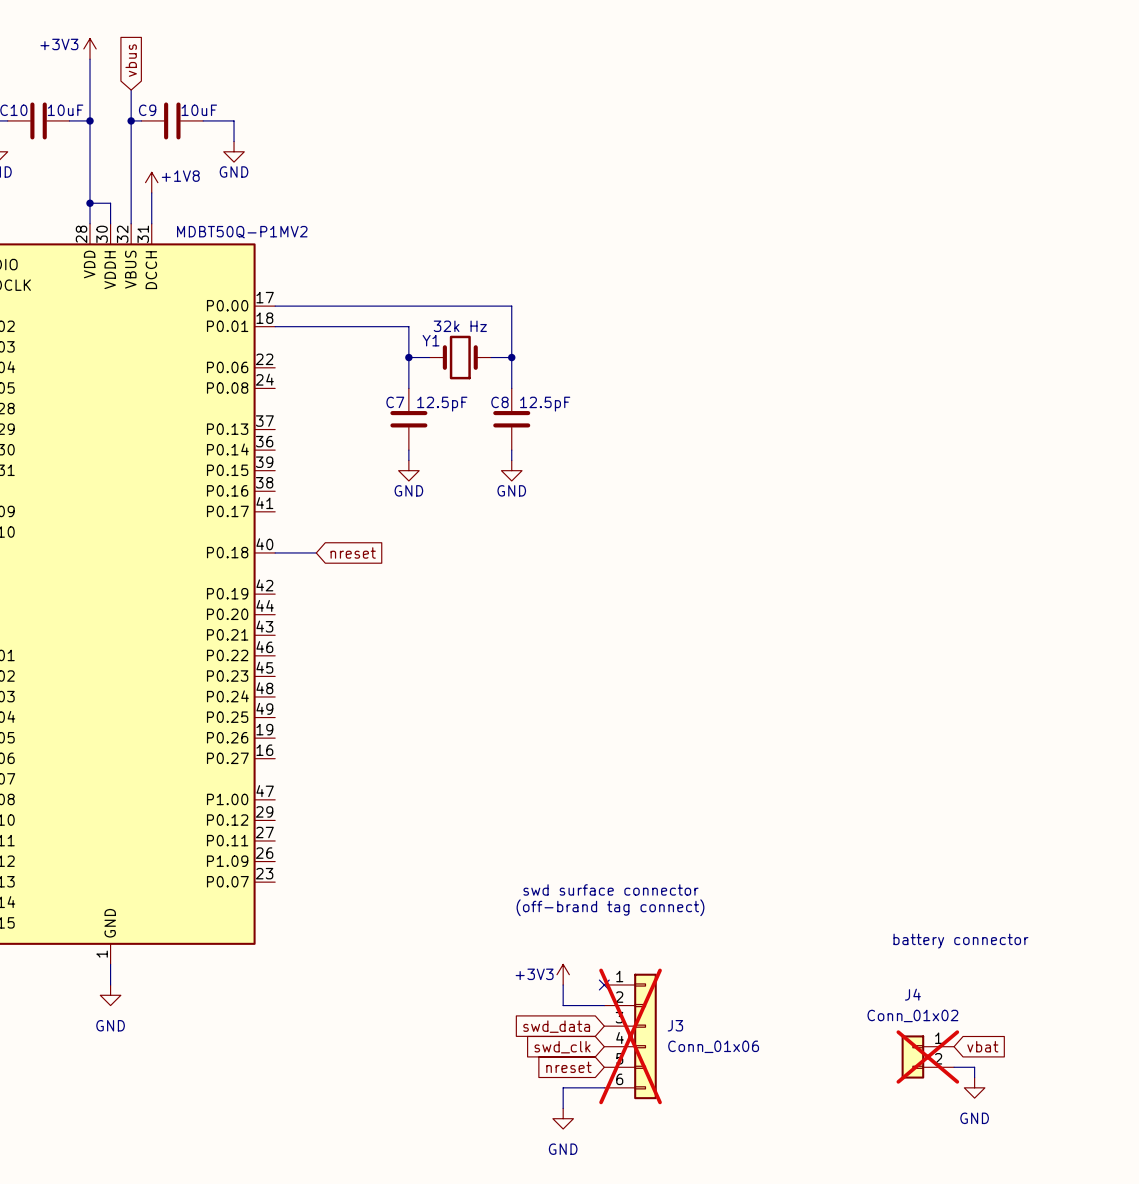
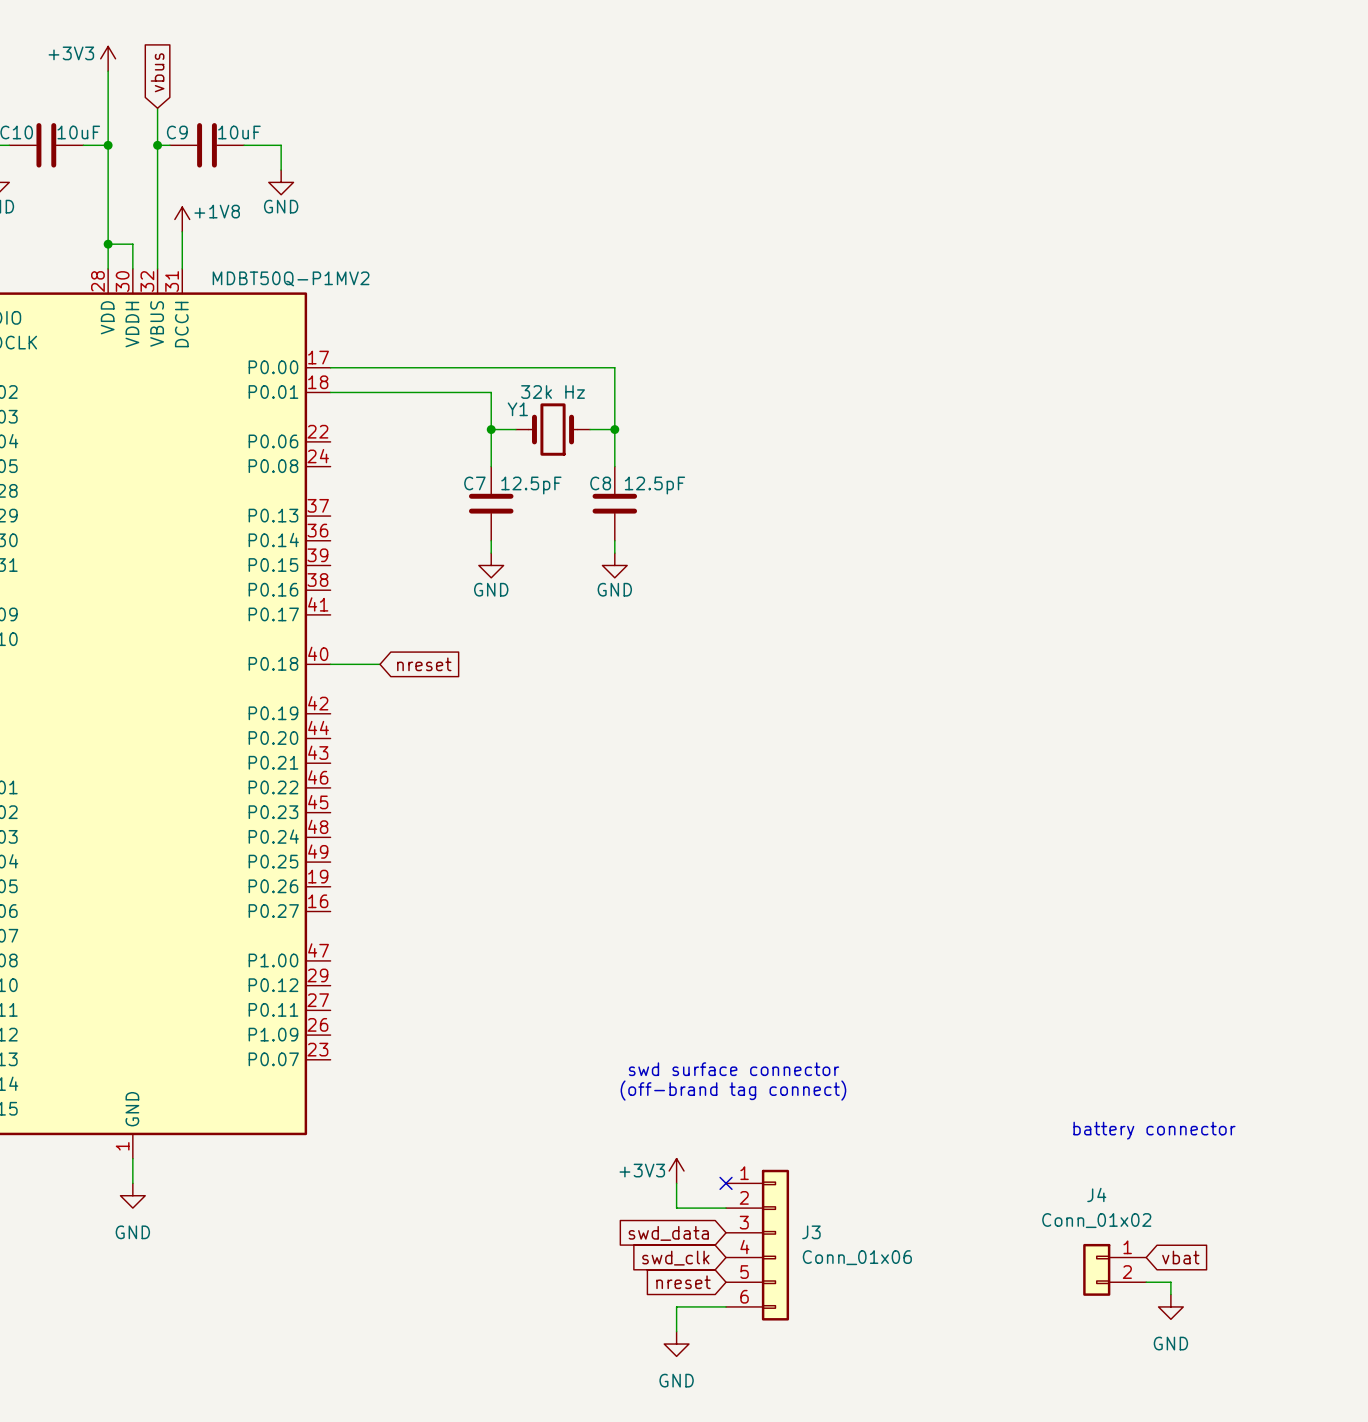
J3 do-not-place cross: (630, 1036) -> none
J4 do-not-place cross: (927, 1057) -> none

